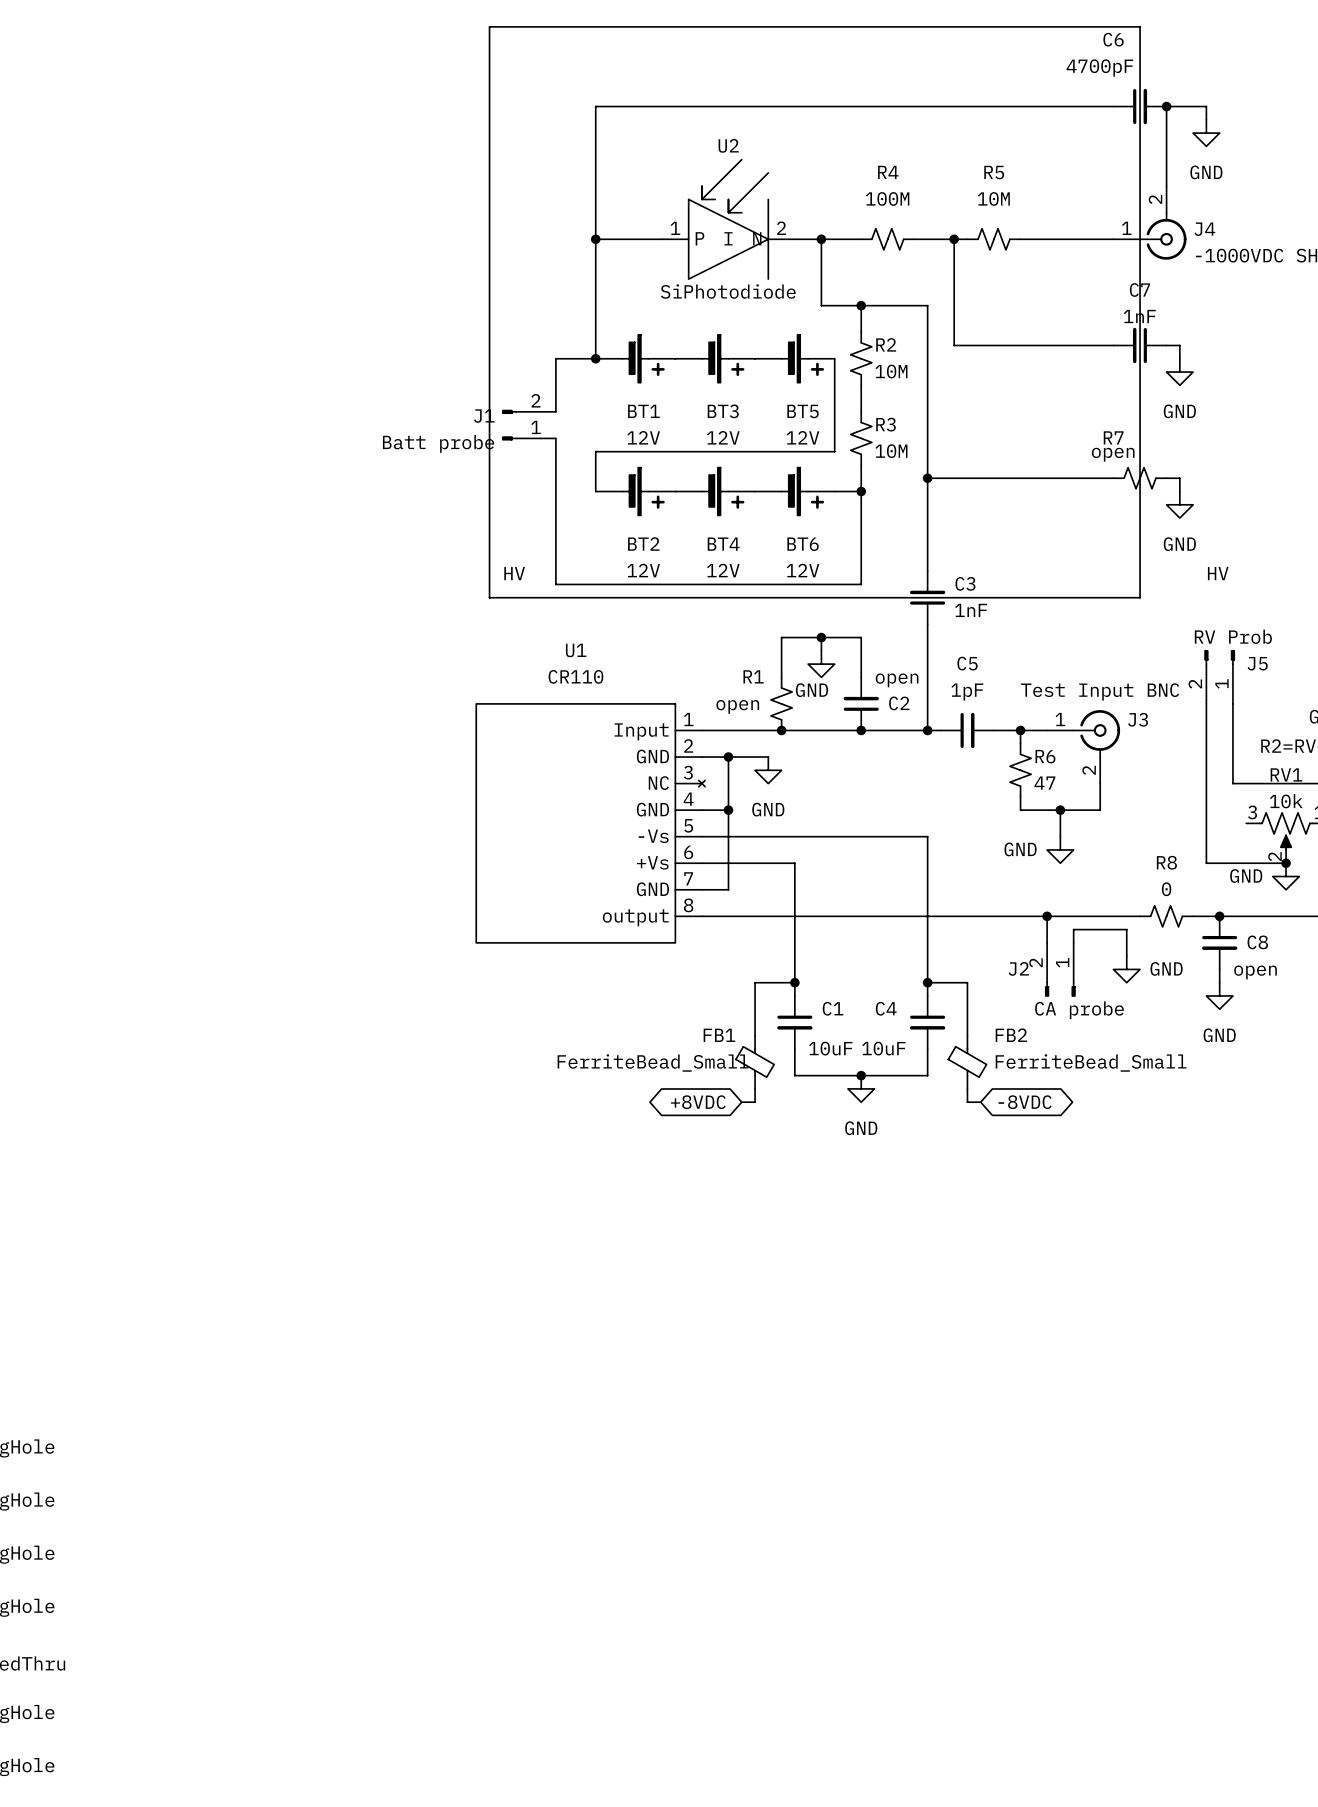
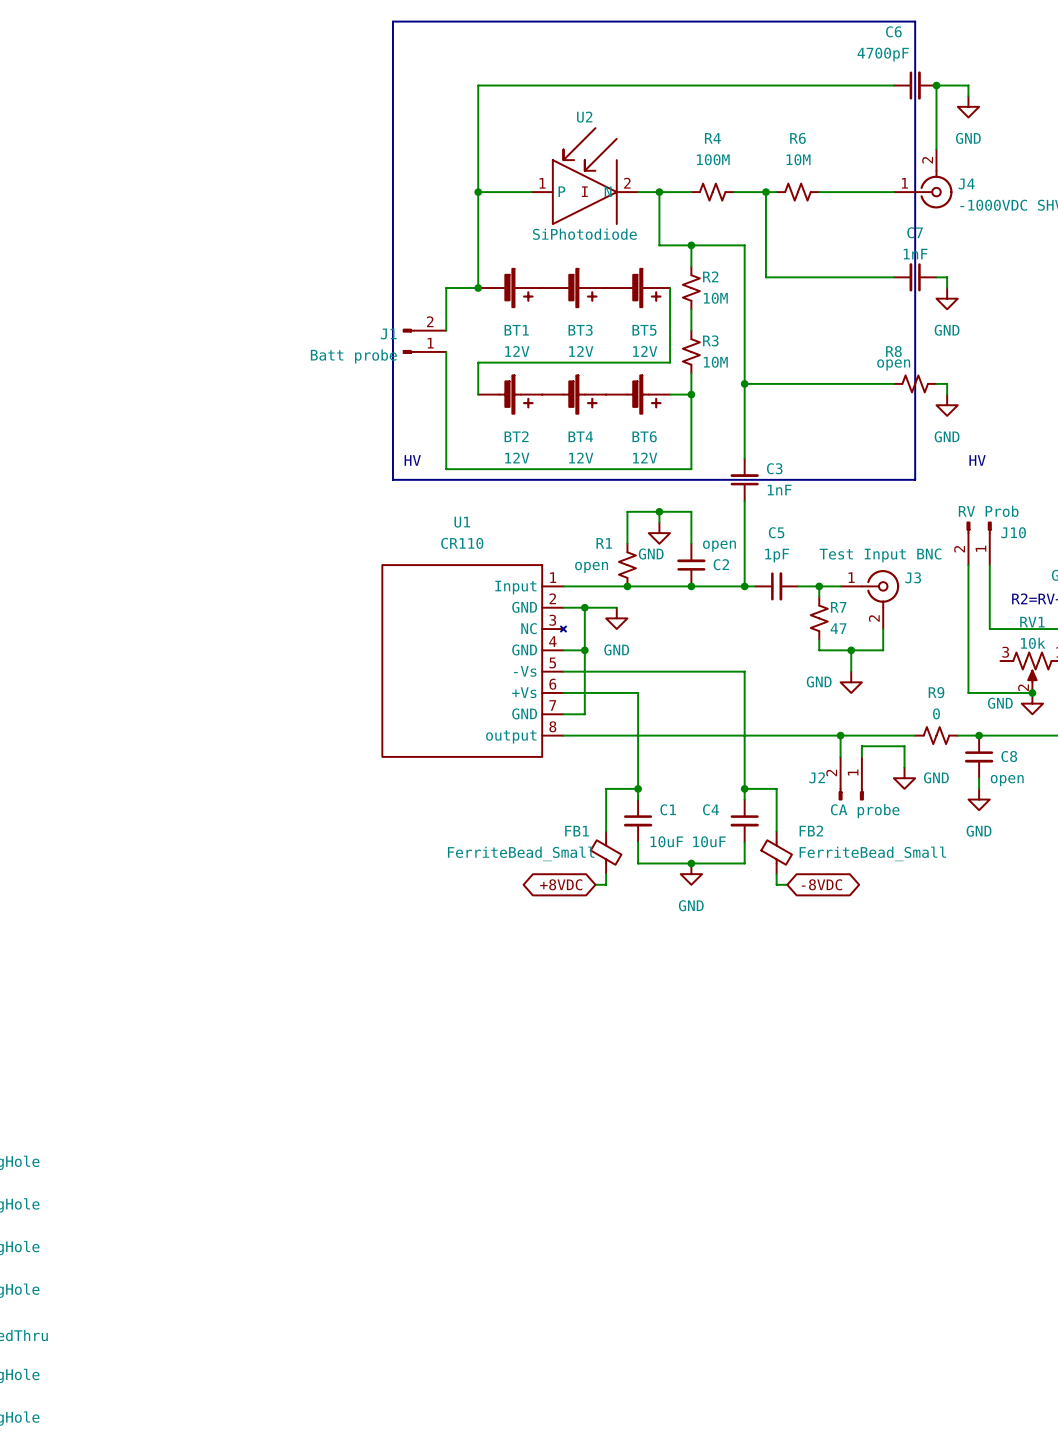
R5 name: R5 (994, 172) -> R6 (797, 138)
R7 name: R7 (1113, 437) -> R8 (893, 351)
J5 name: J5 (1257, 663) -> J10 (1013, 532)
R6 name: R6 (1045, 756) -> R7 (838, 607)
R8 name: R8 (1166, 862) -> R9 (936, 692)

